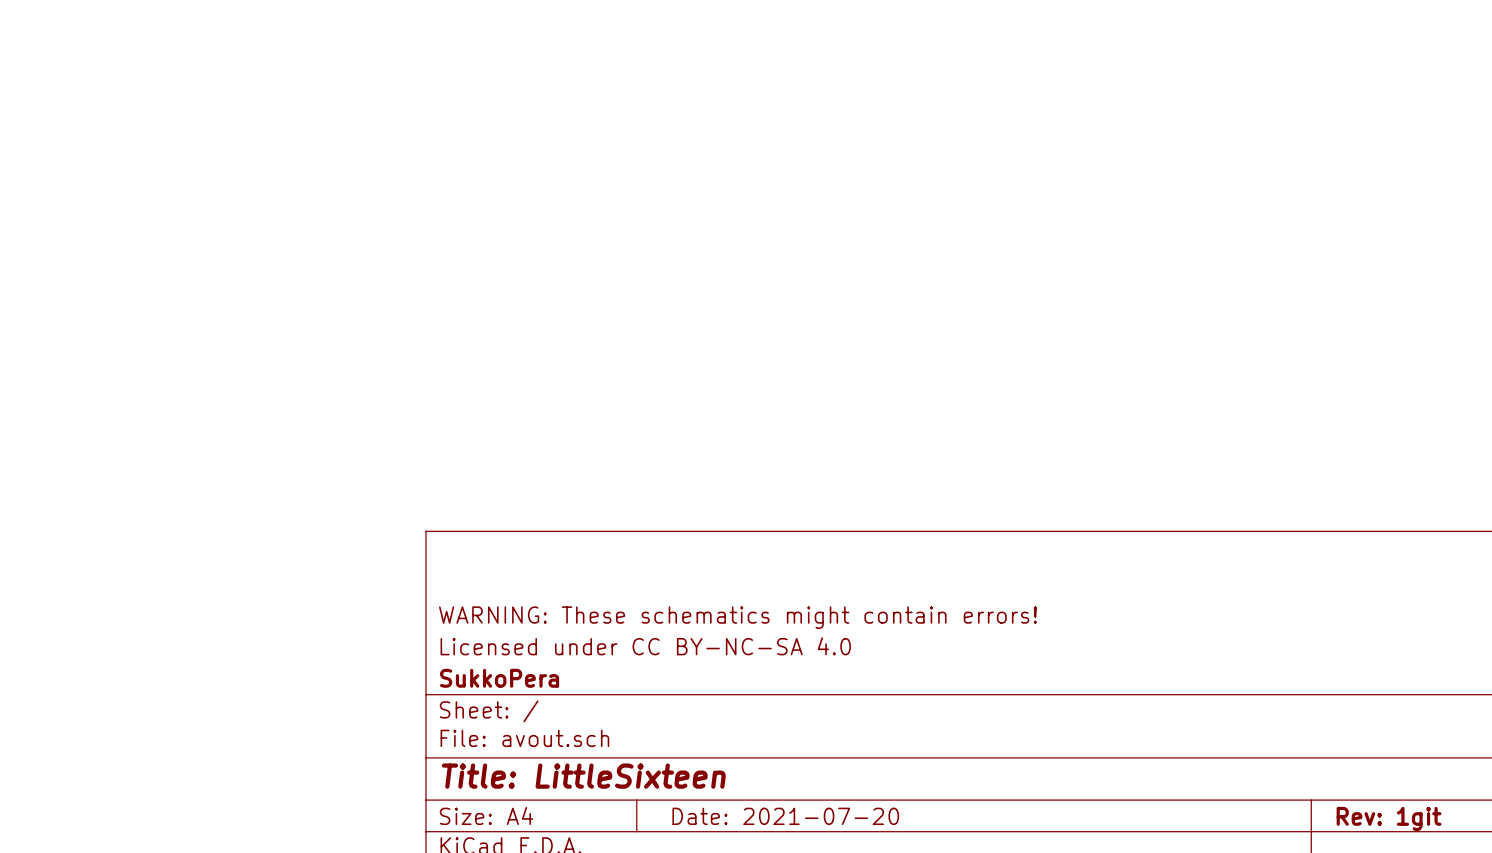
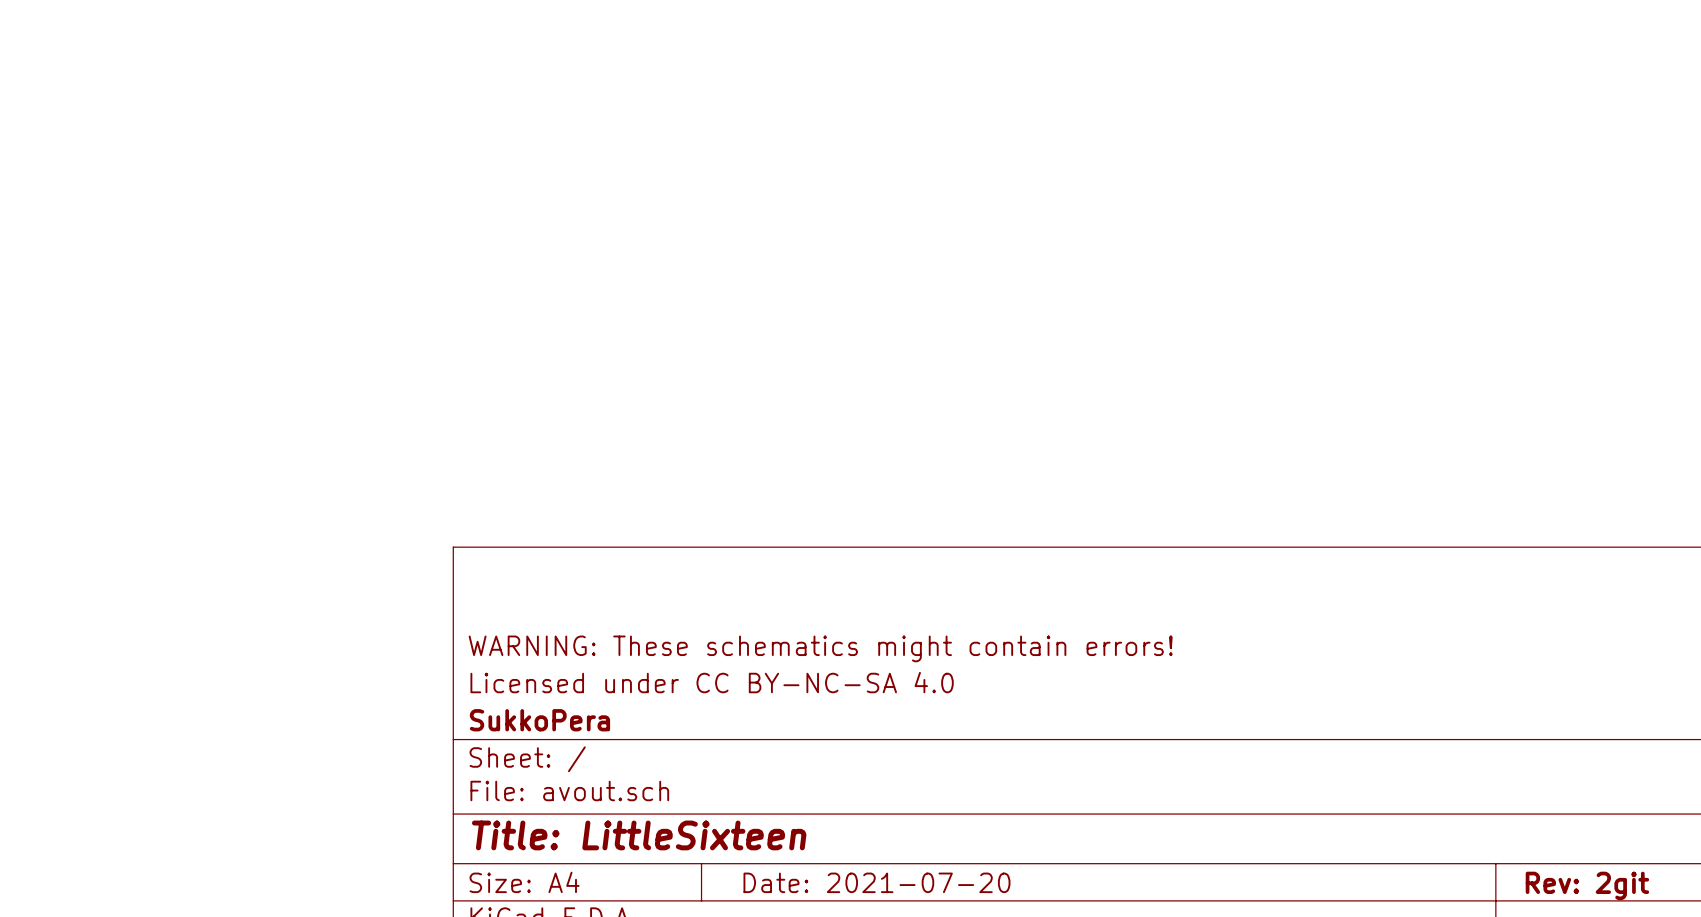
title block: Rev: 1git (1389, 818) -> Rev: 2git (1587, 885)

